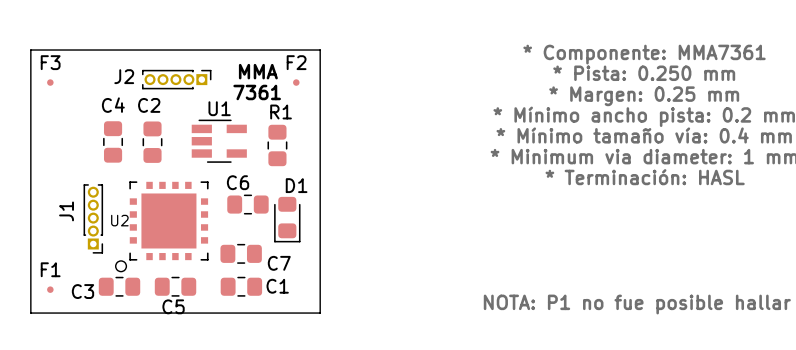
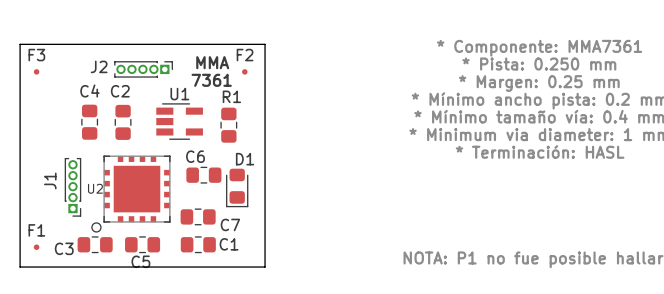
U2 footprint: [115, 181, 209, 273] -> [91, 155, 171, 233]

